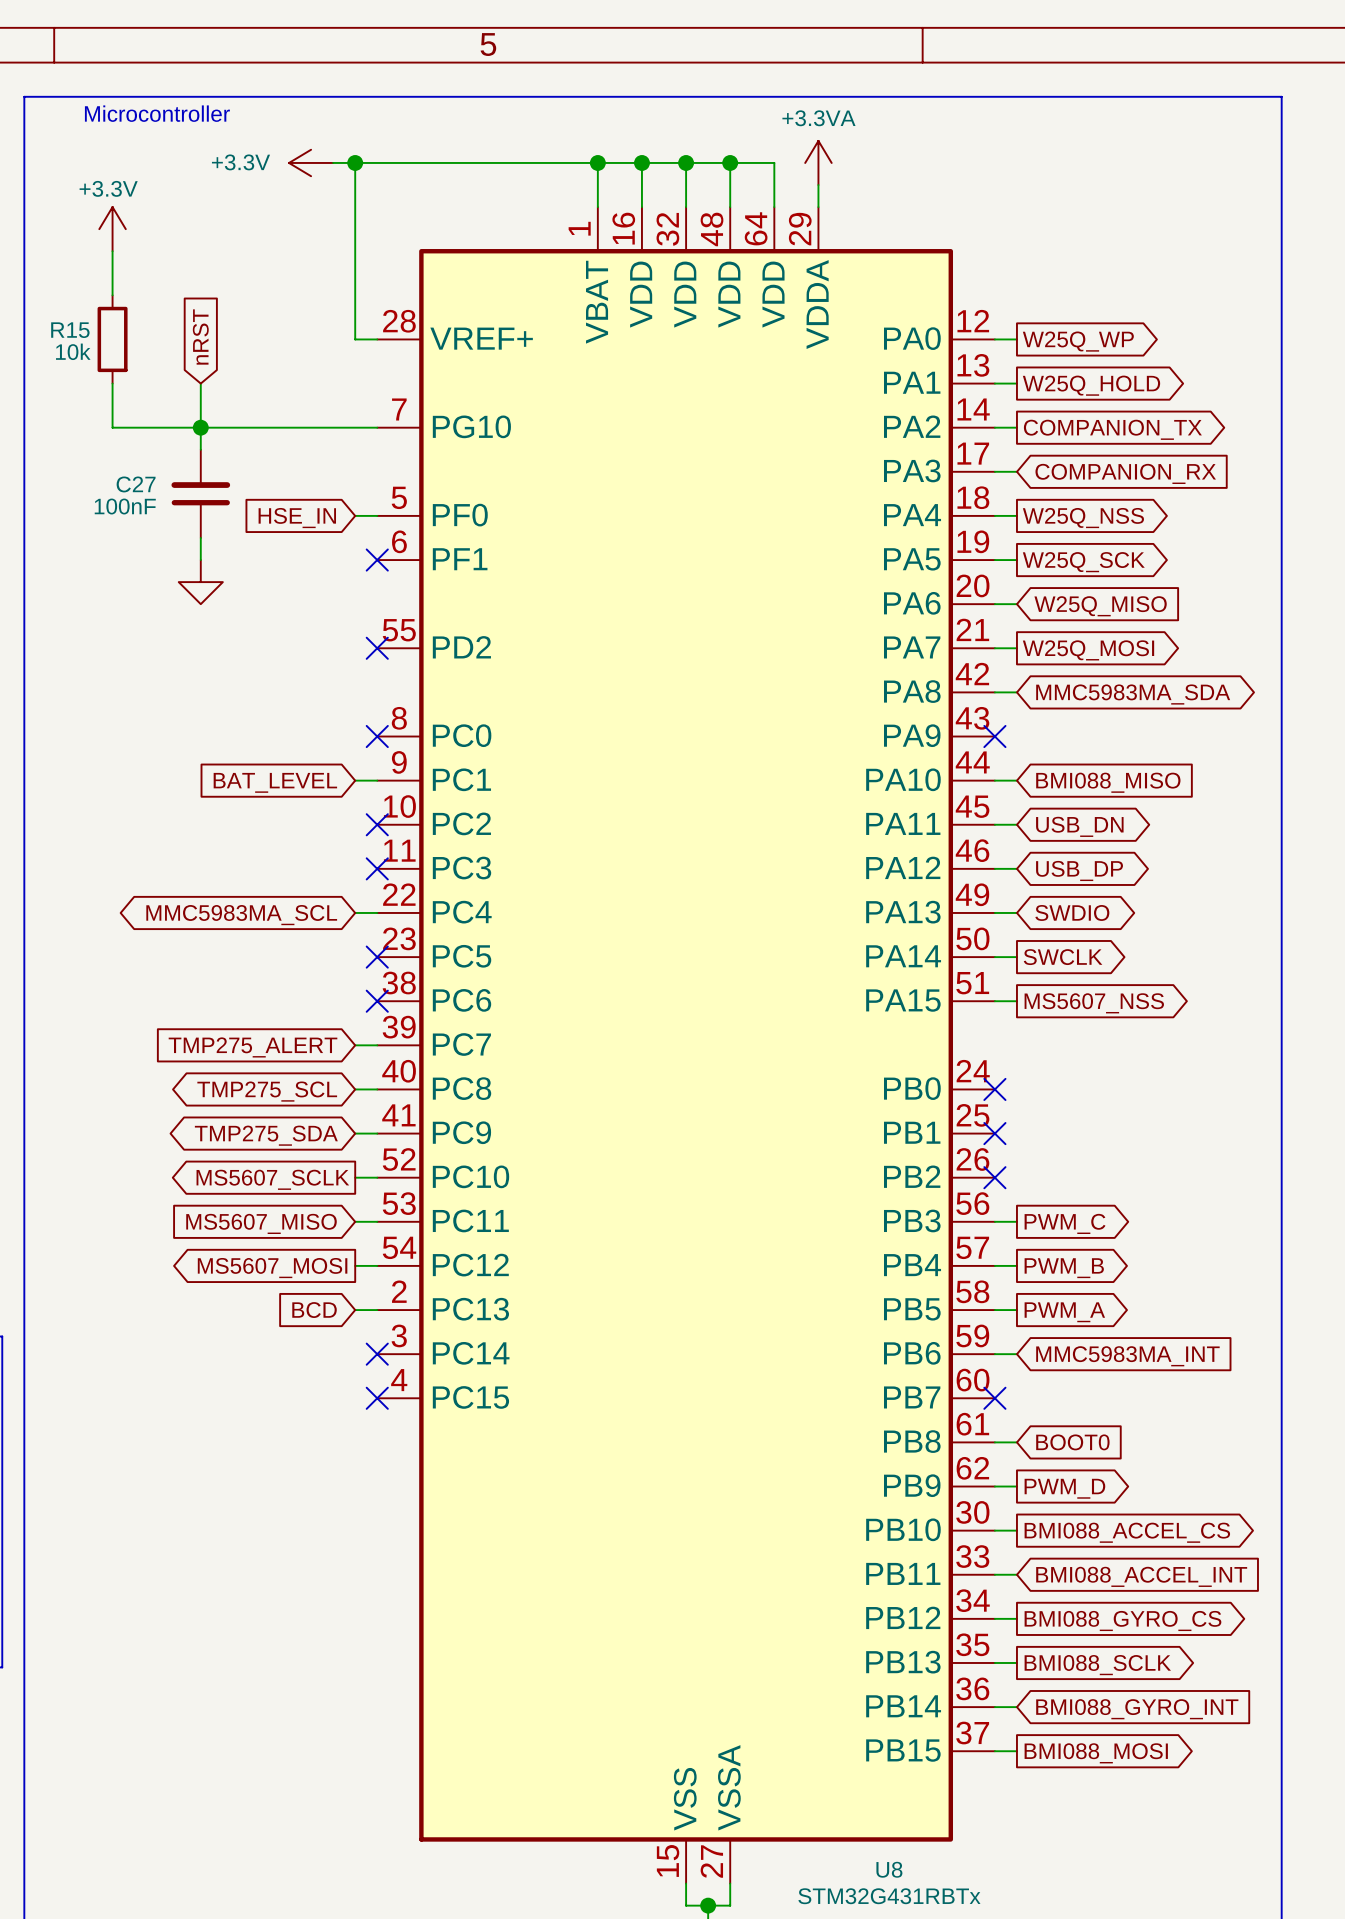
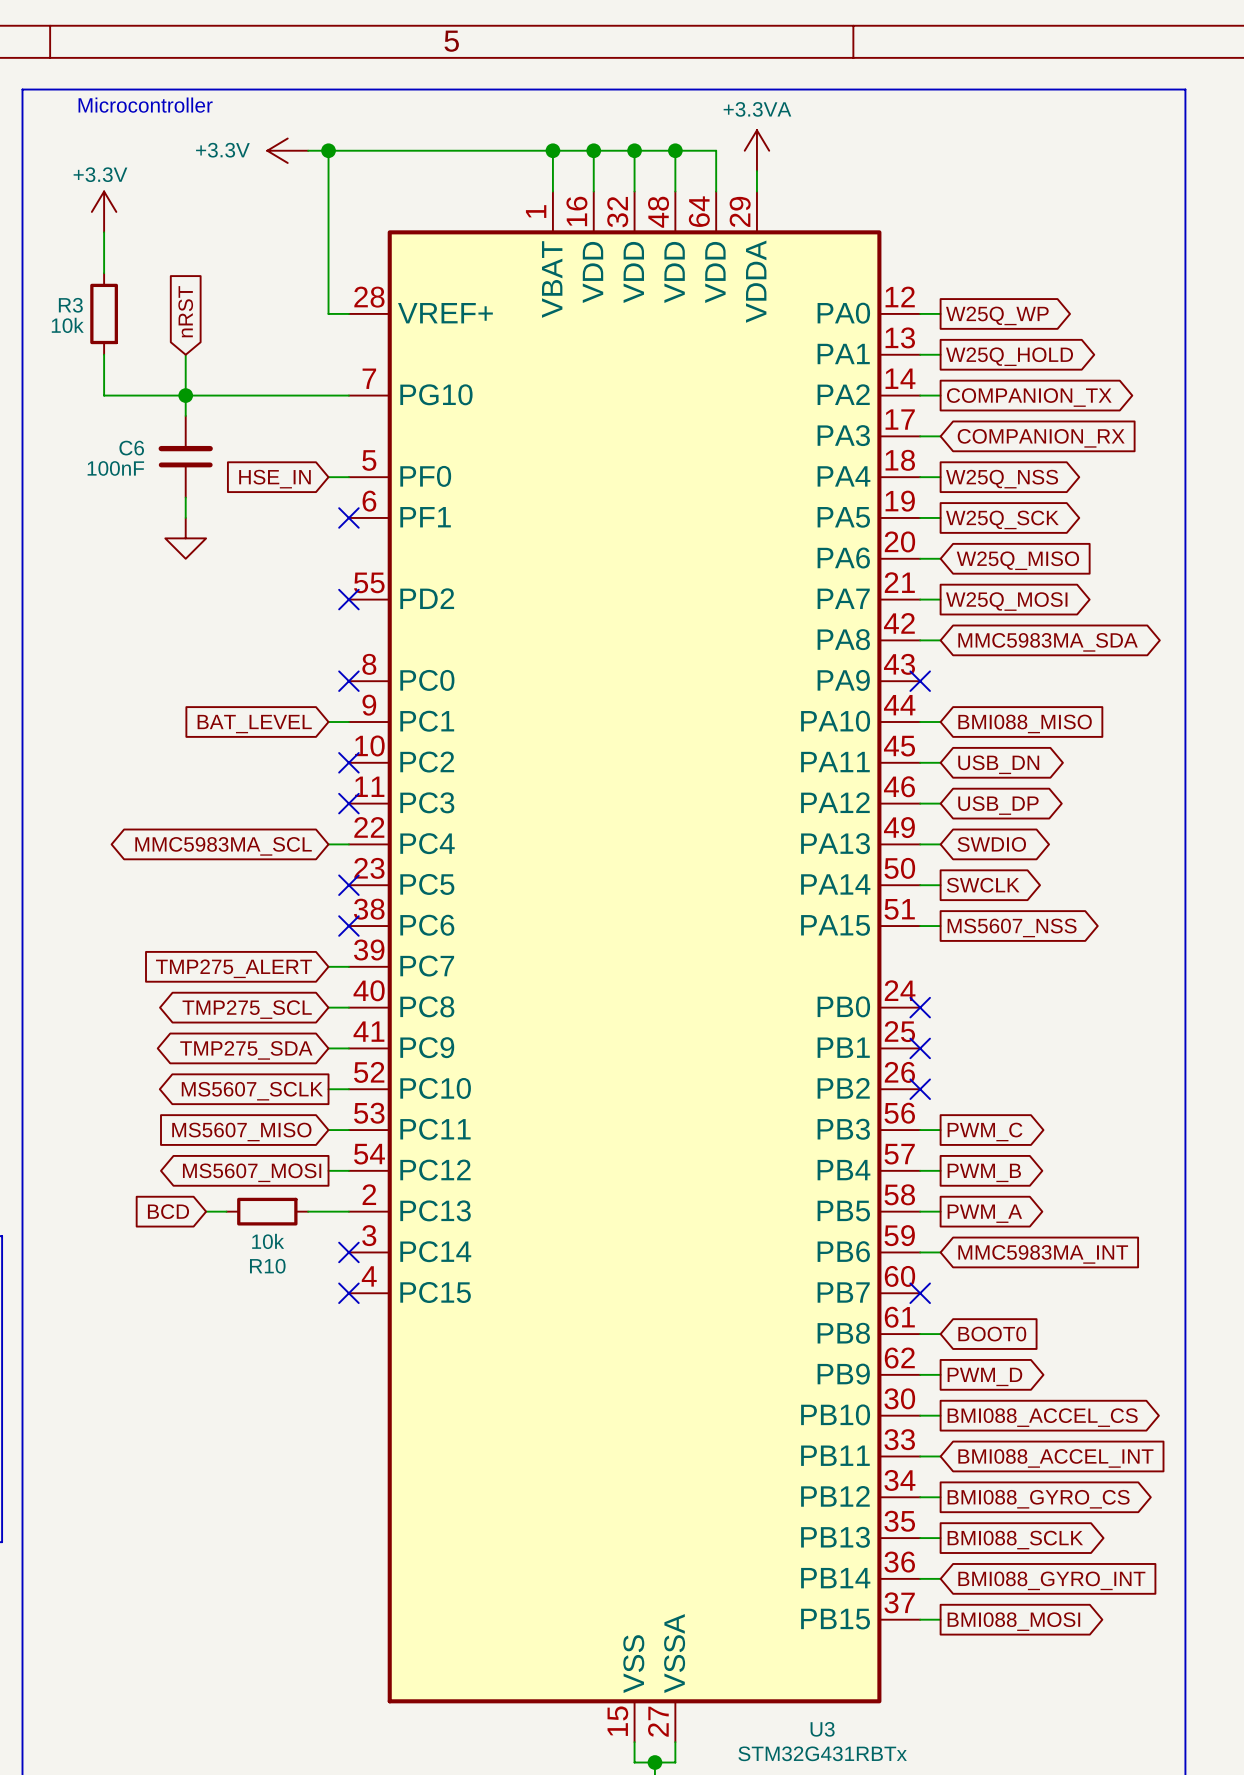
R15 name: R15 (70, 330) -> R3 (70, 305)
C27 name: C27 (136, 484) -> C6 (131, 448)
wire: none -> (206, 1211) (226, 1211)
R10: none -> 10k (267, 1211)
global label position: BCD (314, 1310) -> BCD (168, 1211)
wire: none -> (308, 1211) (328, 1211)
U8 name: U8 (889, 1869) -> U3 (822, 1729)

